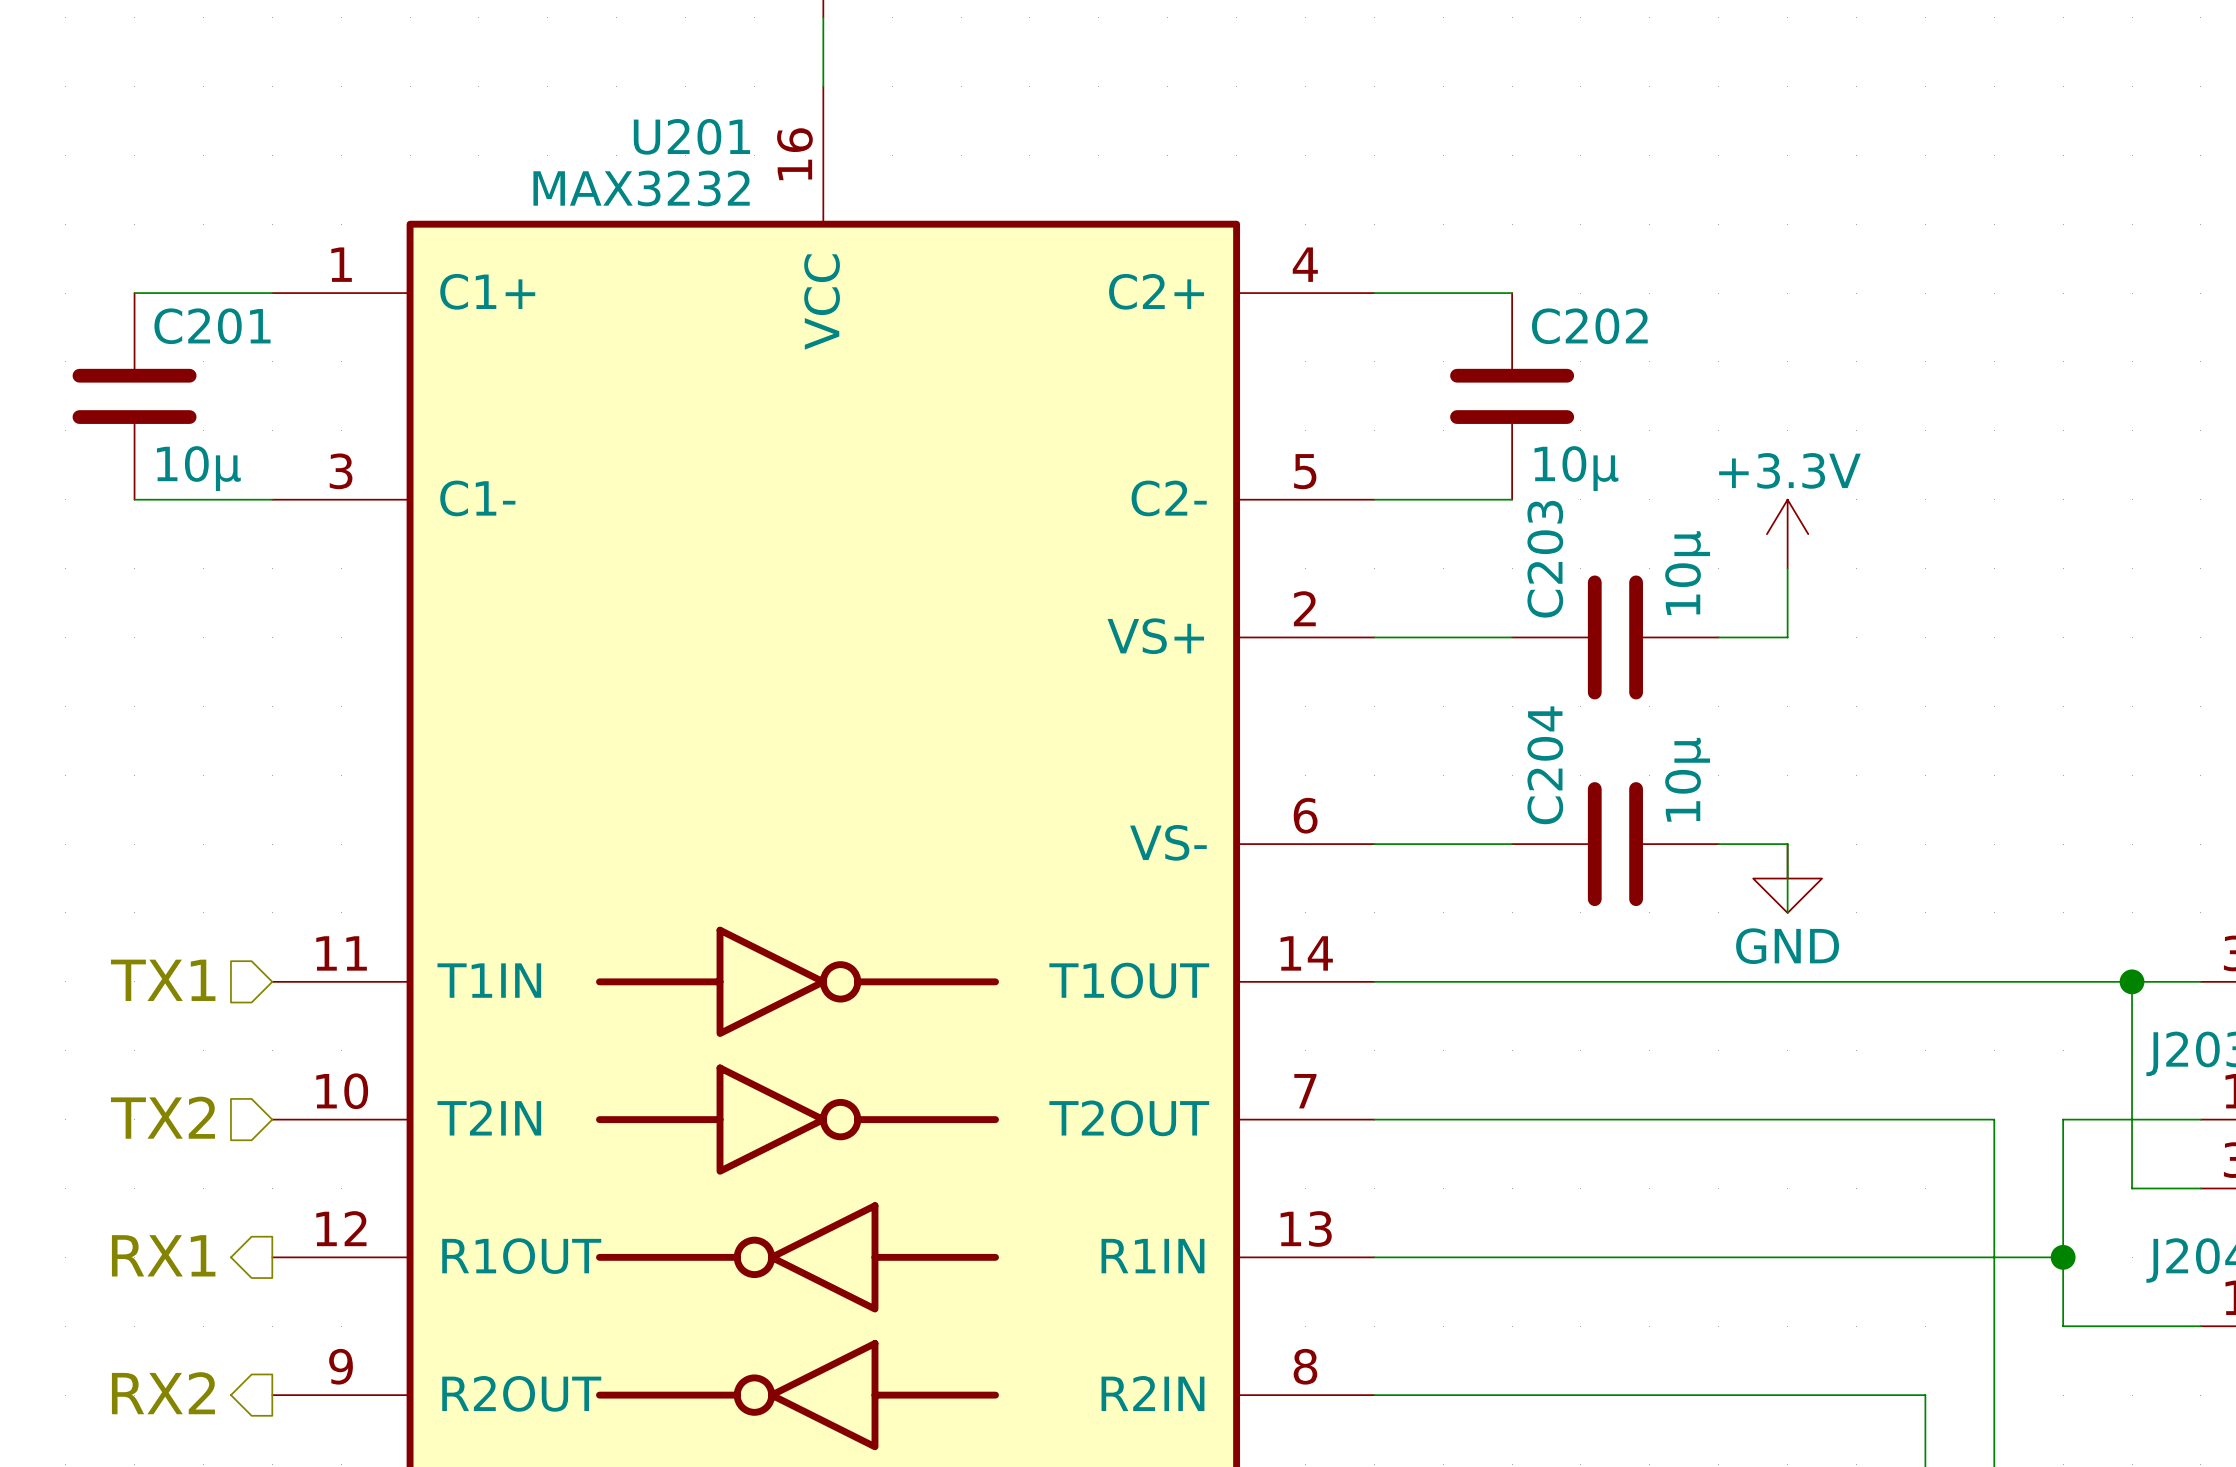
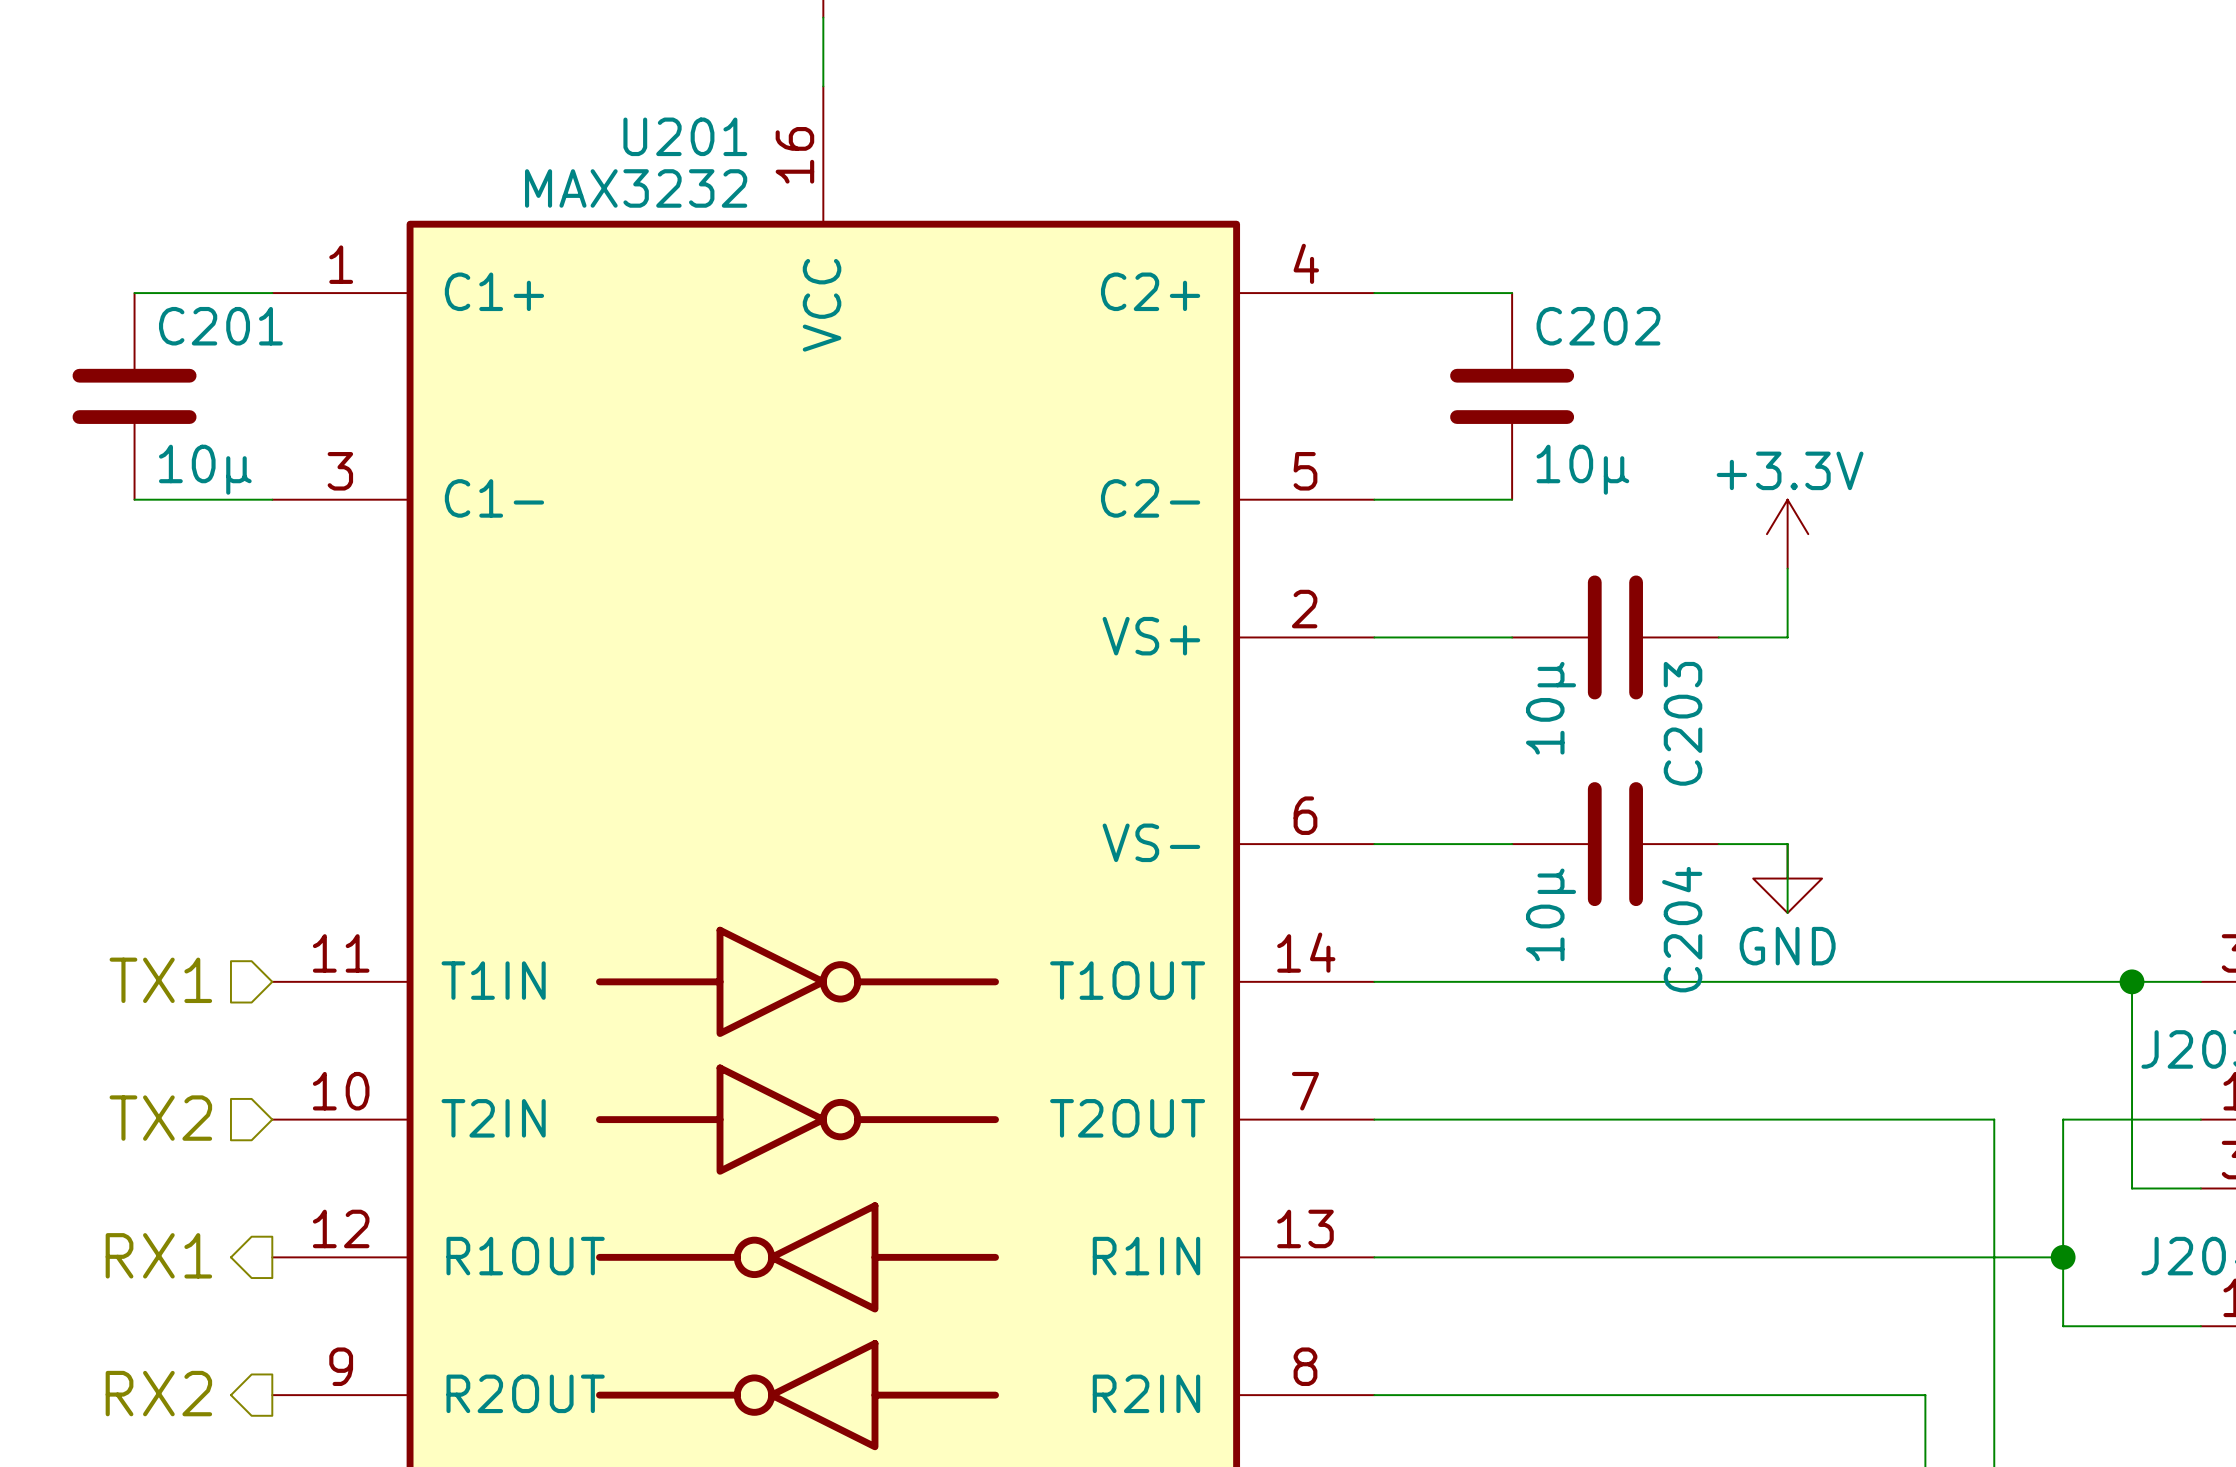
C203 name position: C203 (1545, 559) -> C203 (1683, 723)
C203 value position: 10µ (1687, 573) -> 10µ (1551, 708)
C204 name position: C204 (1545, 765) -> C204 (1682, 929)
C204 value position: 10µ (1687, 779) -> 10µ (1551, 914)

